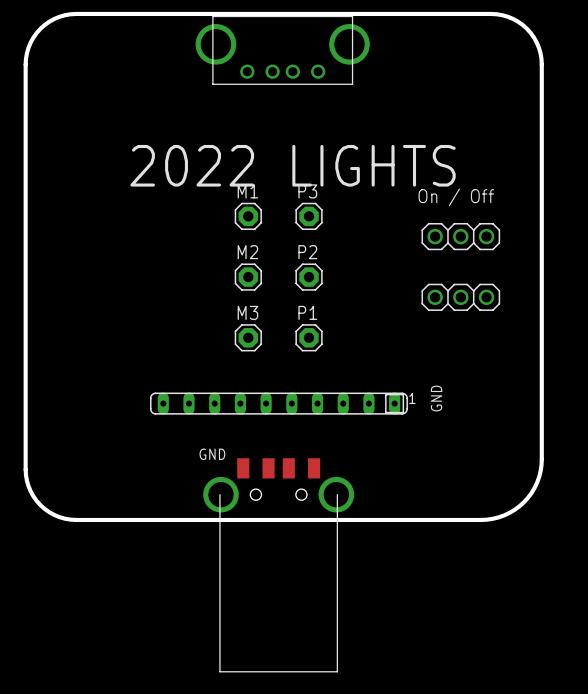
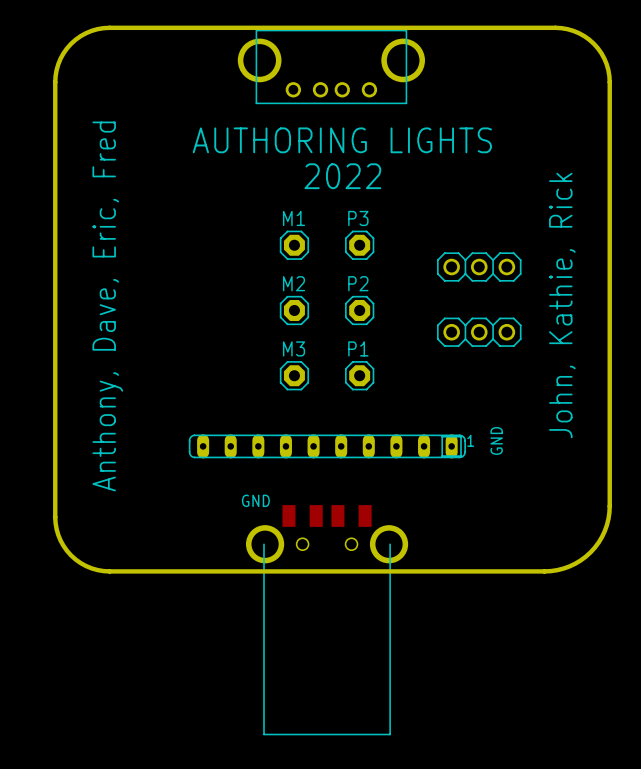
text: none -> AUTHORING LIGHTS (342, 140)
text: none -> 2022 (342, 176)
text: 2022 LIGHTS (293, 165) -> none
text: On / Off (456, 197) -> none
part: none -> (479, 267)
part: (460, 236) -> none
text: none -> John, Kathie, Rick (562, 305)
text: none -> Anthony, Dave, Eric, Fred (107, 306)
part: none -> (479, 332)
part: (460, 297) -> none

